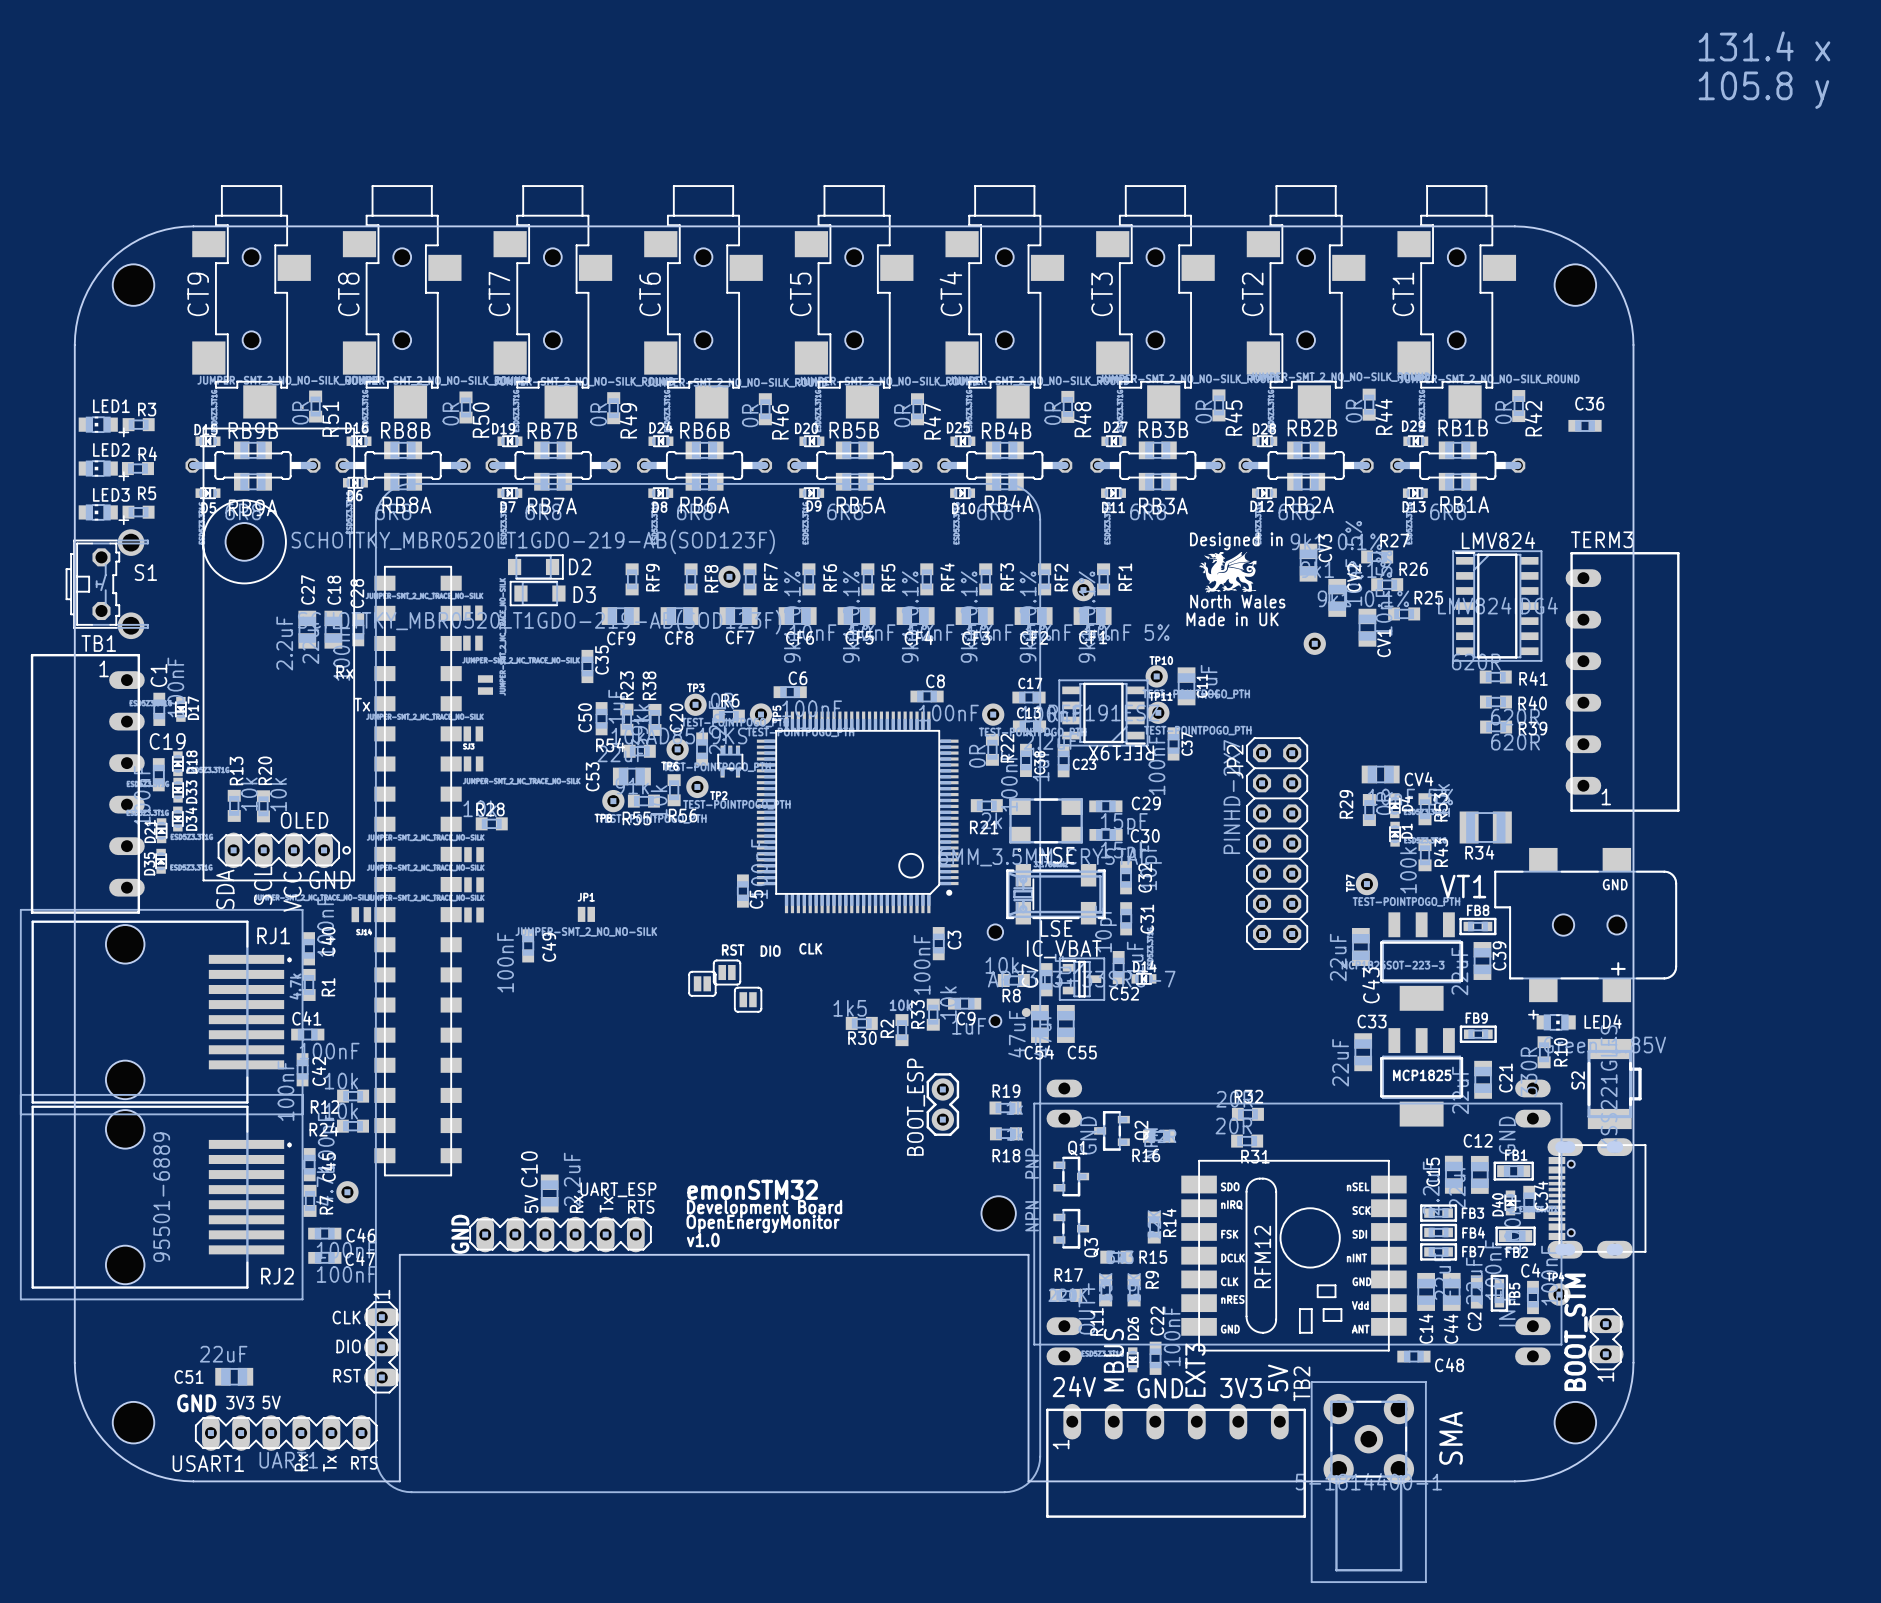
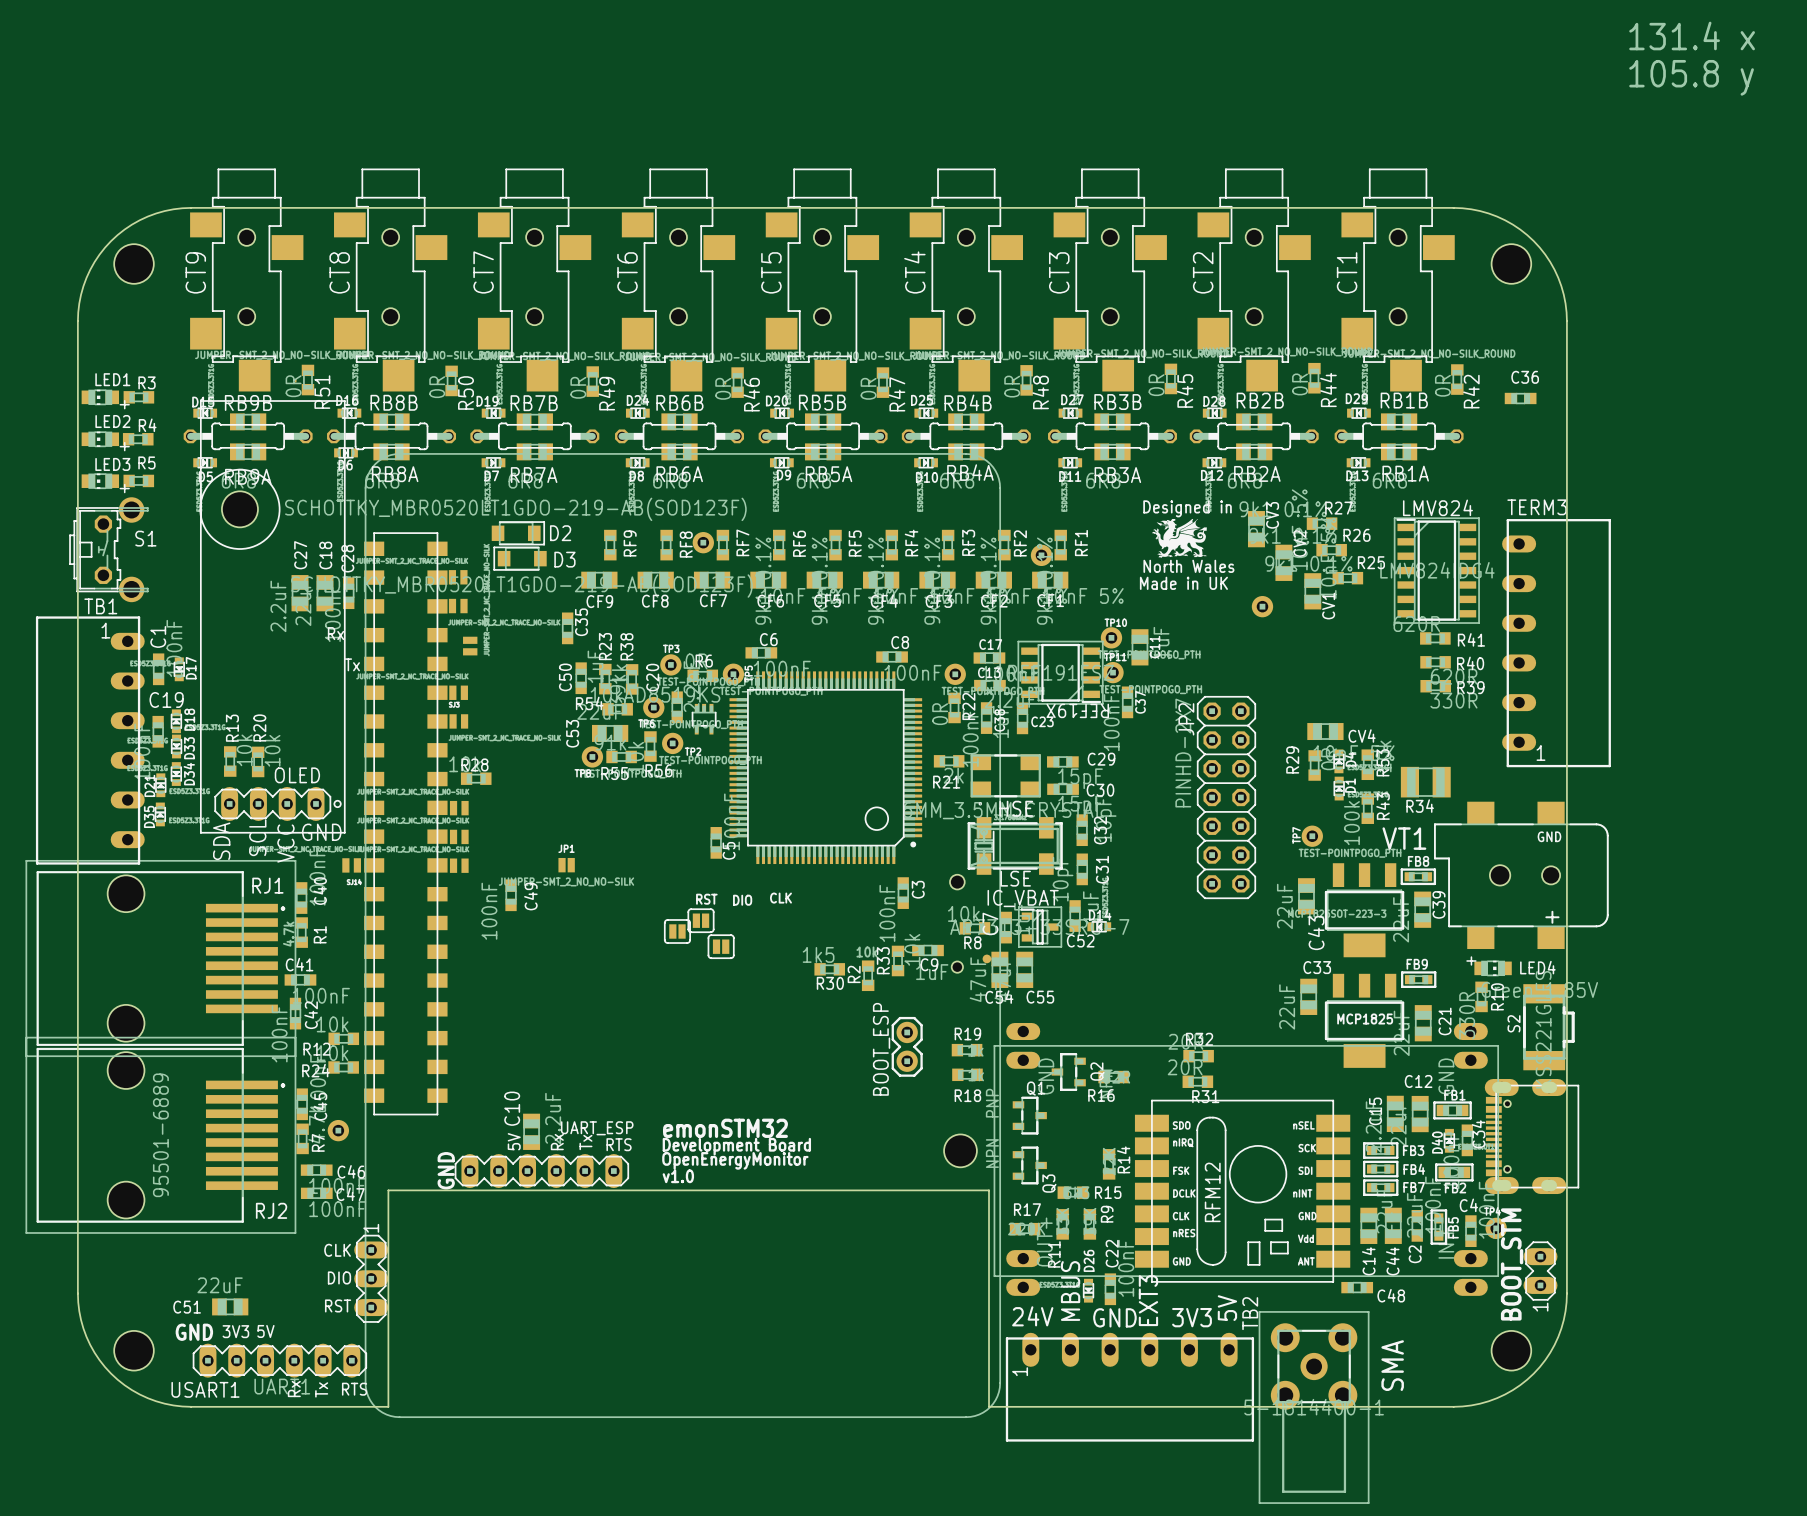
R39 value: 620R (1515, 742) -> 330R (1453, 700)

